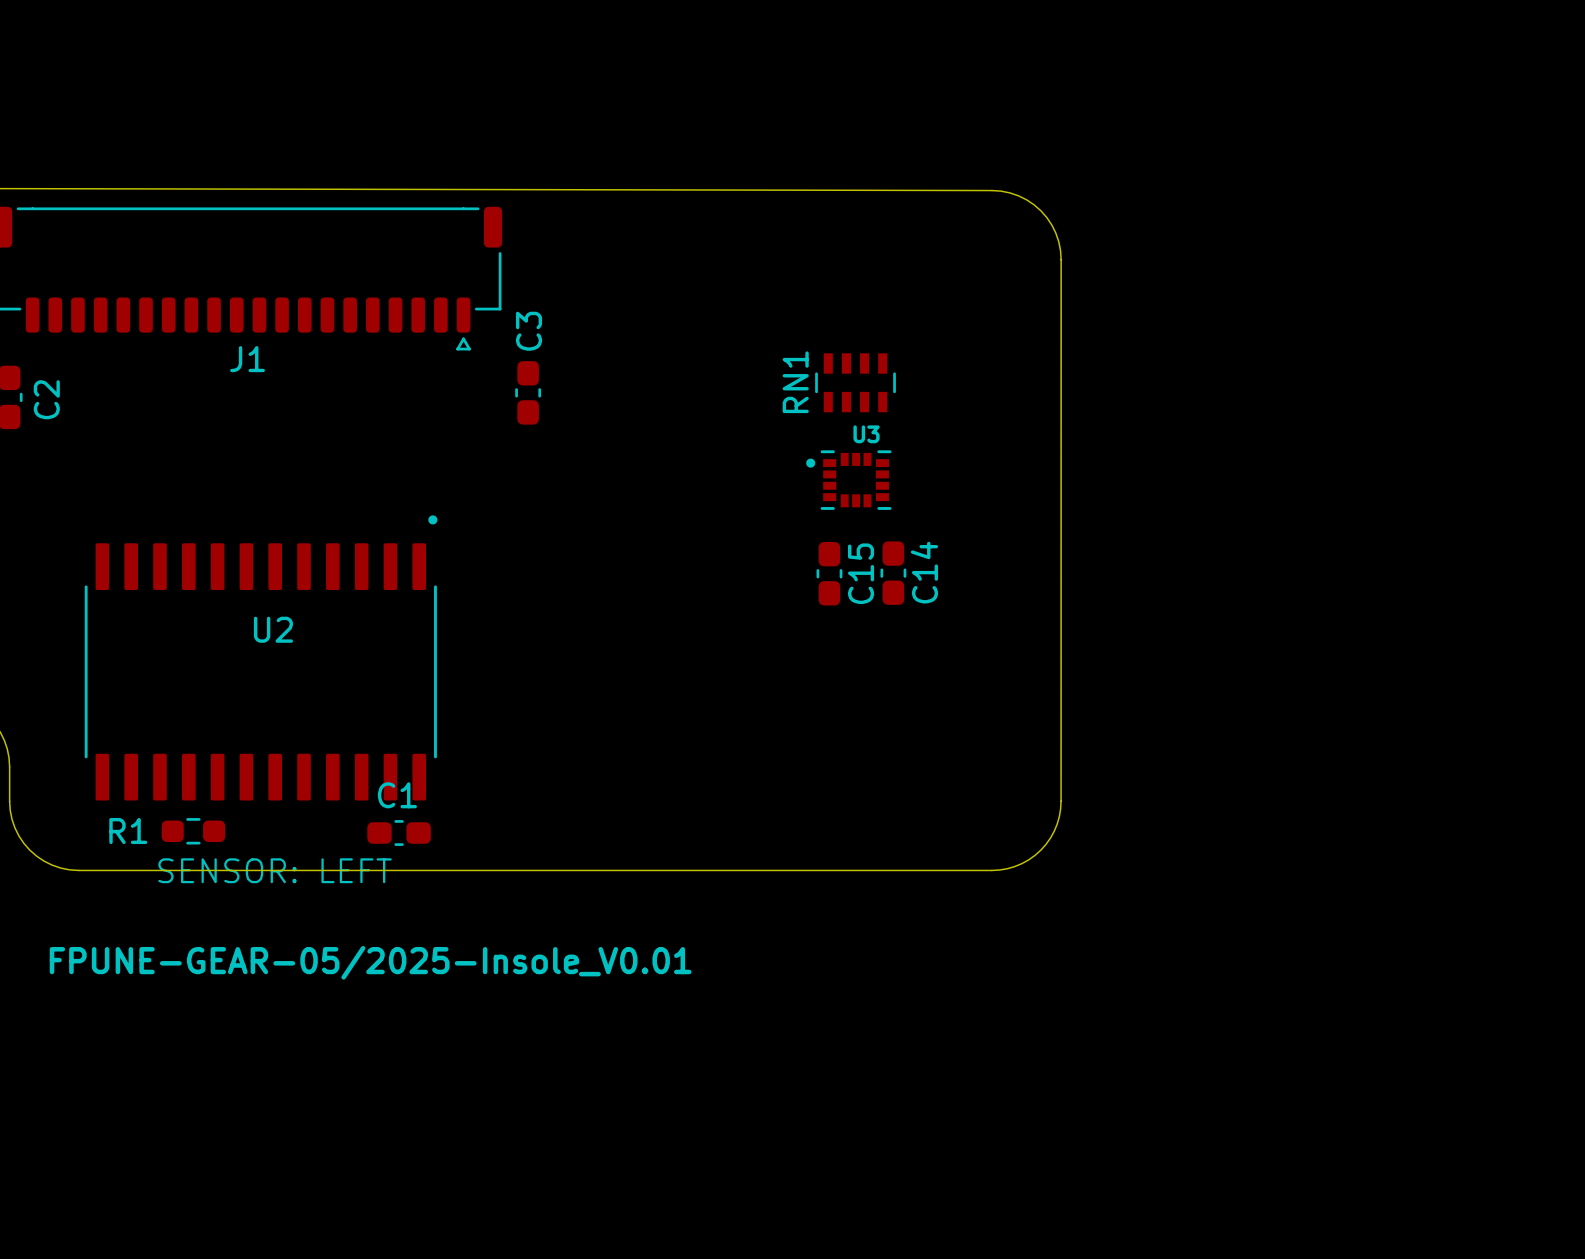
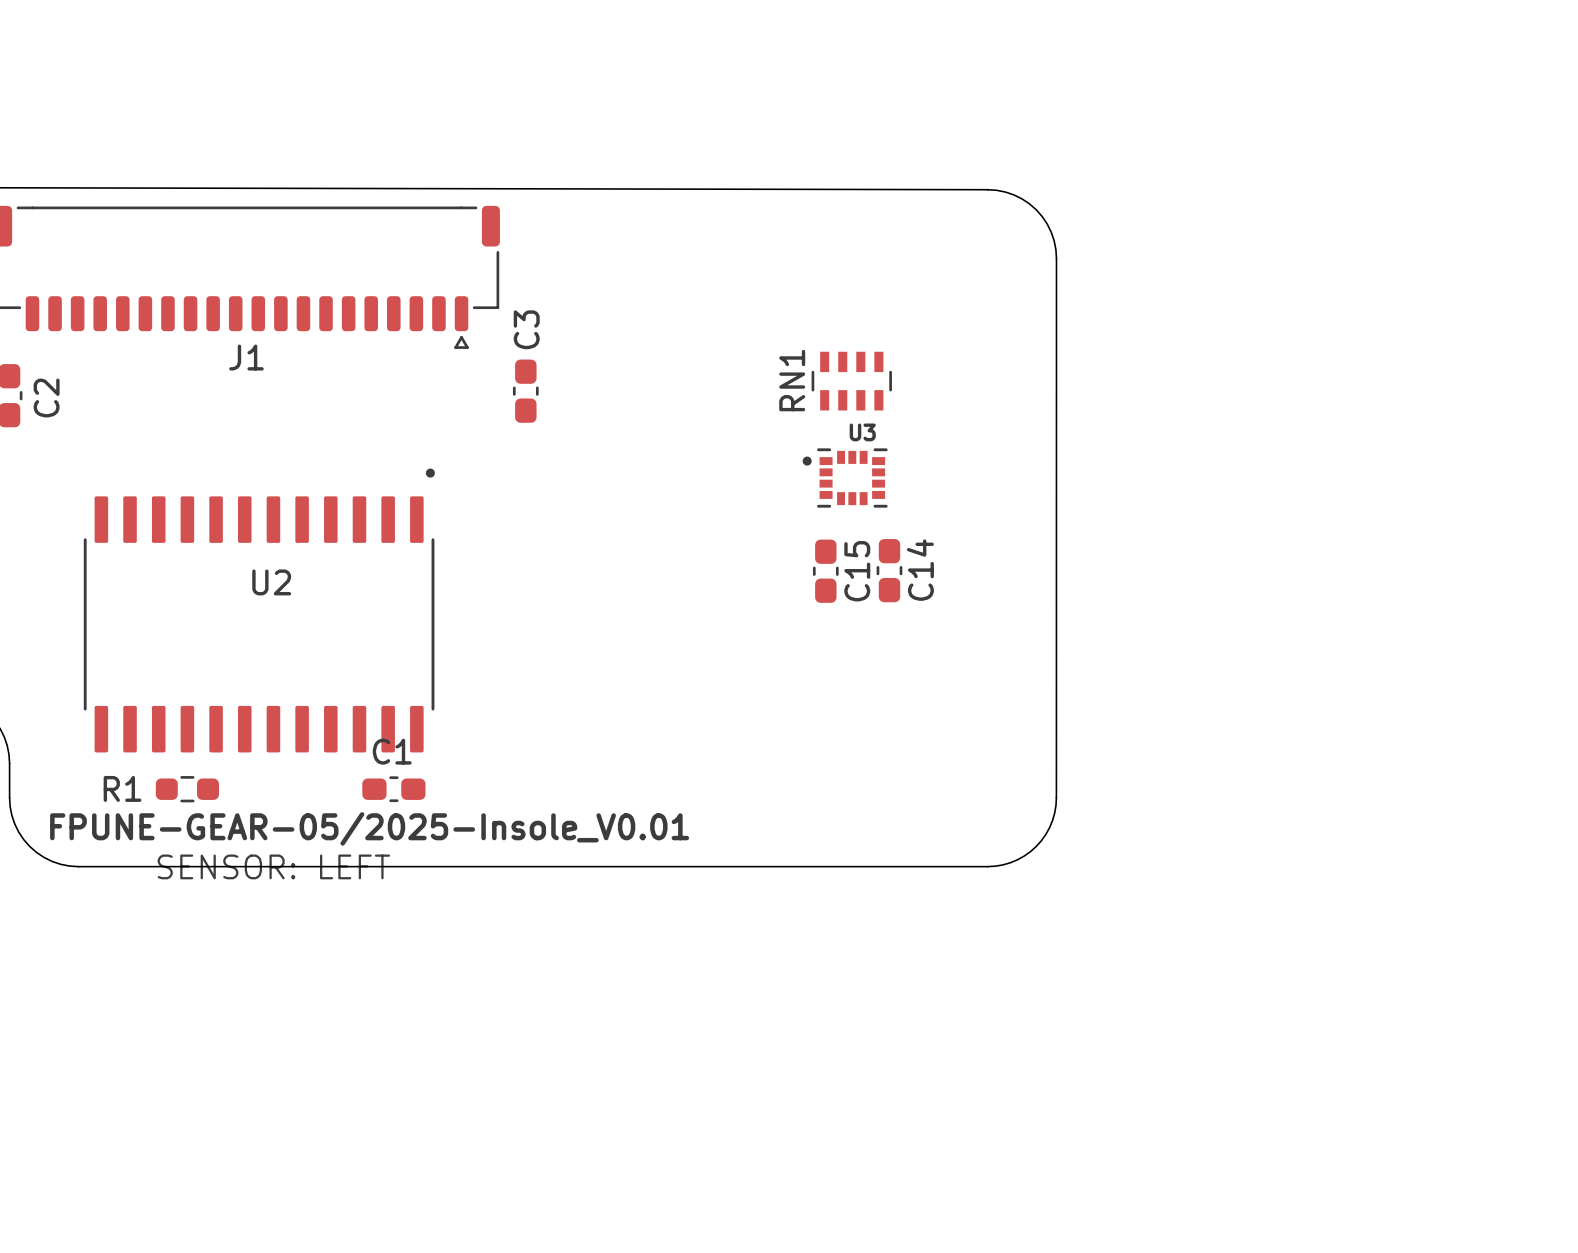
U2 position: (261, 657) -> (259, 610)
R1 position: (193, 831) -> (187, 789)
C1 position: (399, 833) -> (393, 789)
text position: FPUNE-GEAR-05/2025-Insole_V0.01 (370, 962) -> FPUNE-GEAR-05/2025-Insole_V0.01 (369, 828)

